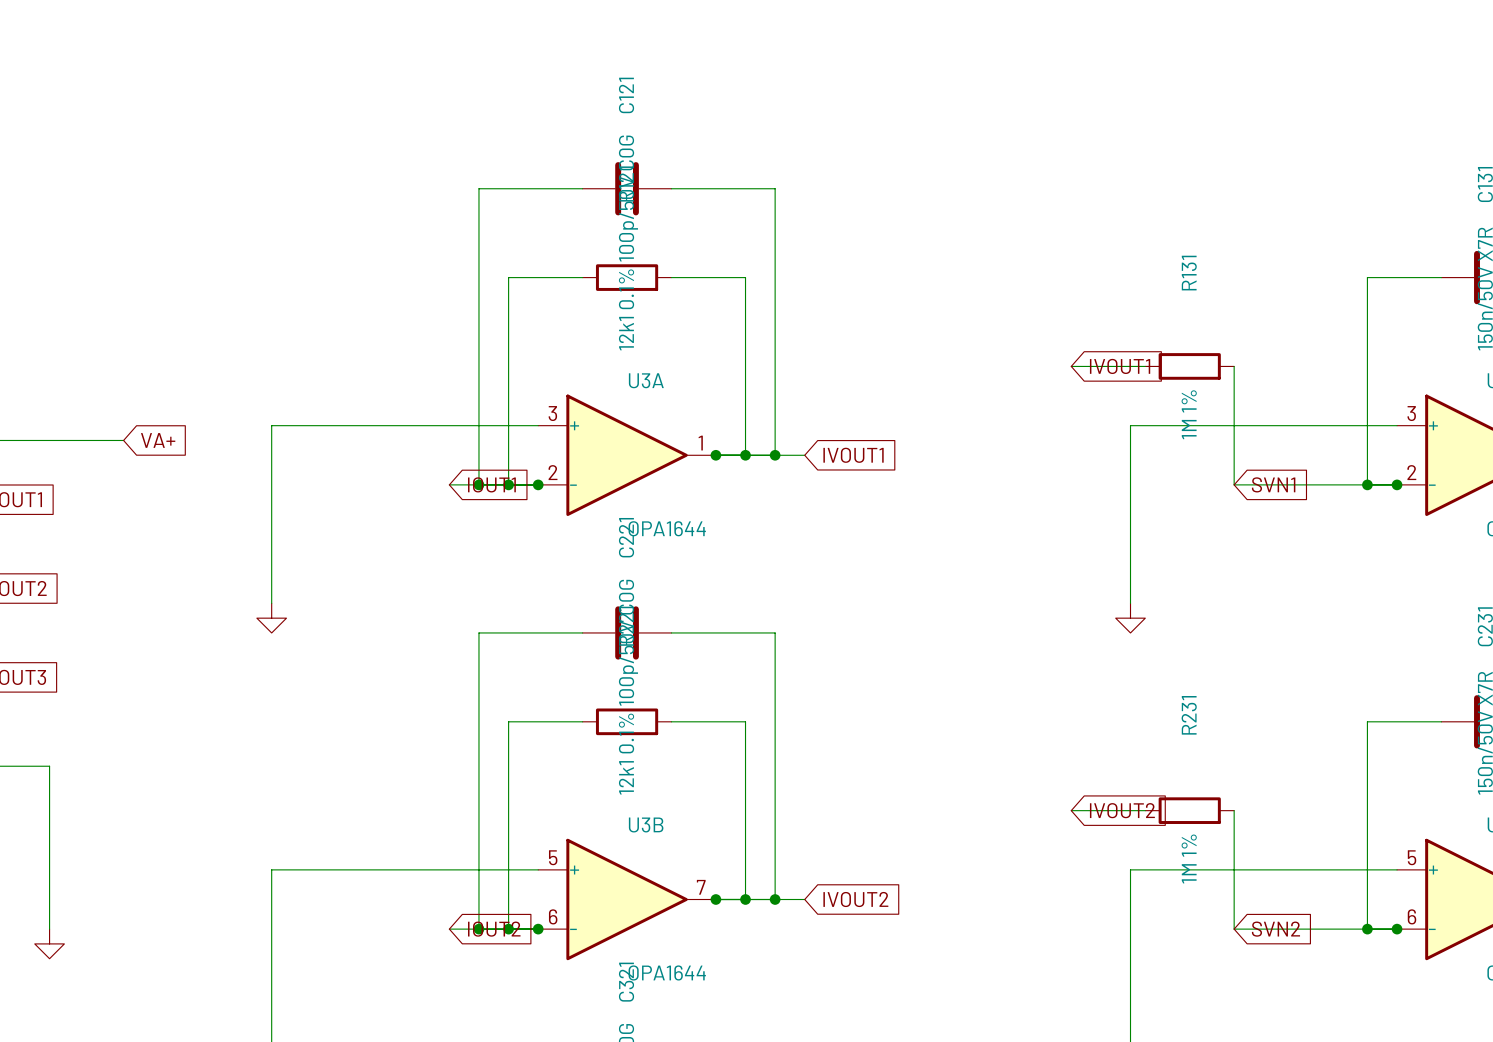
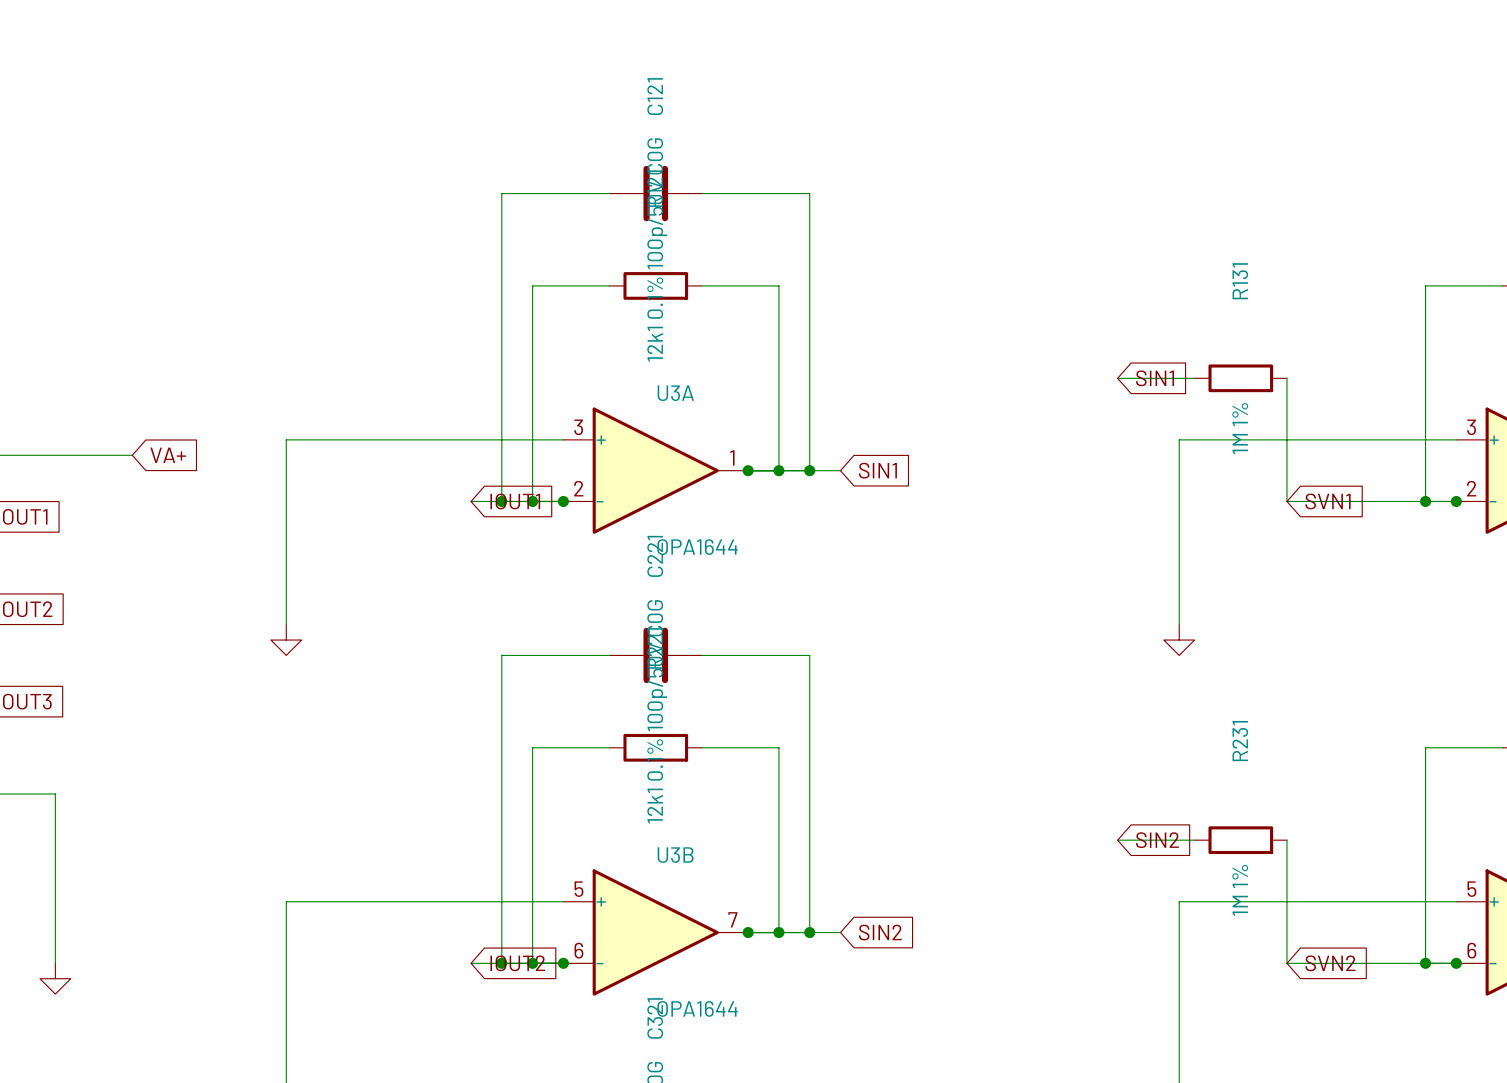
global label: IVOUT1 (1120, 366) -> SIN1 (1155, 378)
global label: IVOUT1 (853, 455) -> SIN1 (877, 470)
global label: IVOUT2 (1122, 810) -> SIN2 (1157, 840)
global label: IVOUT2 (855, 899) -> SIN2 (880, 932)

